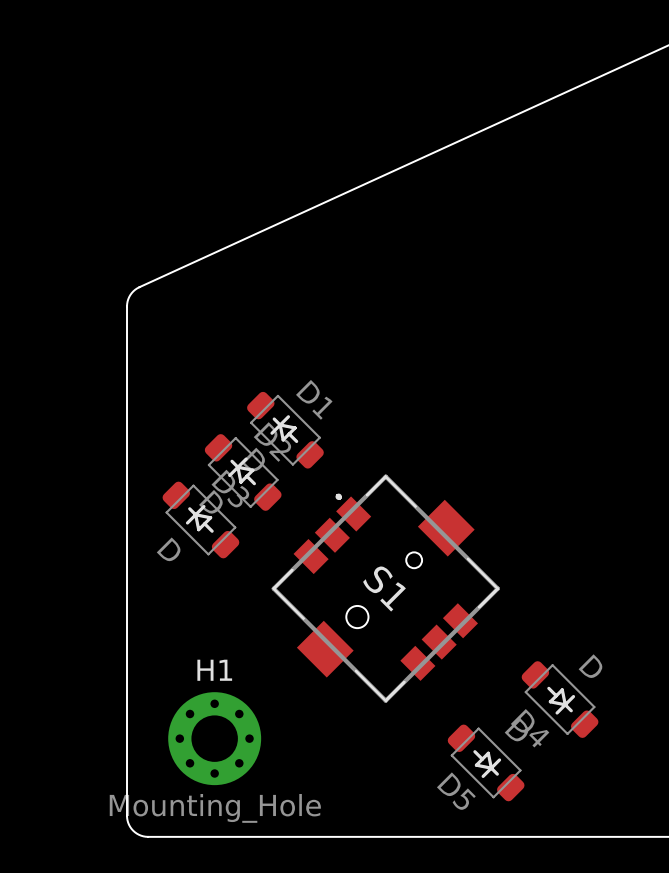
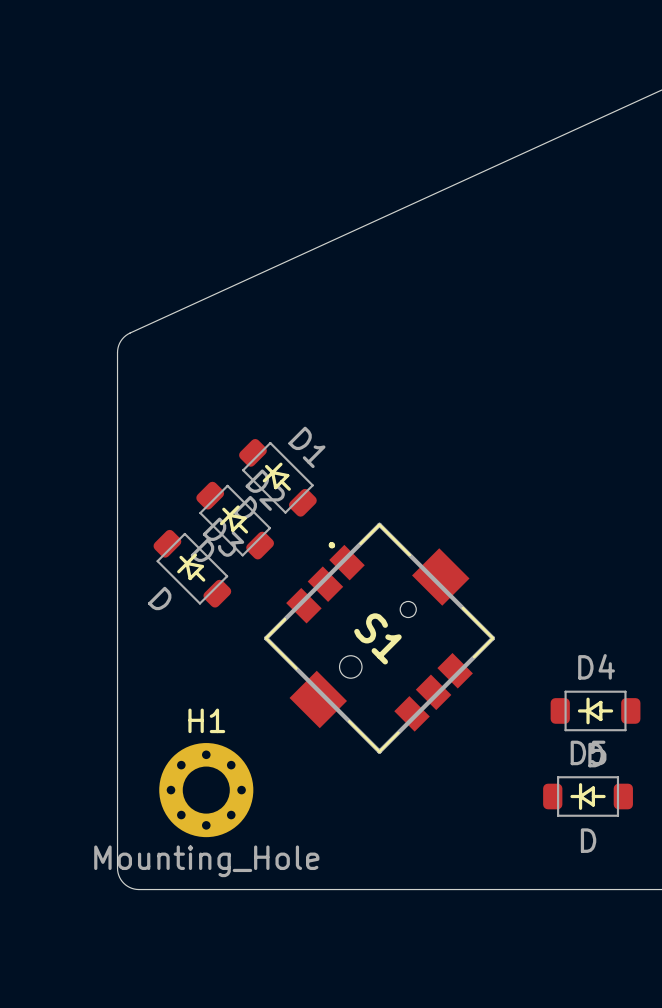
D4 rotation: 0° (560, 699) -> 135° clockwise (595, 710)
D4 position: (560, 699) -> (595, 710)
D5 rotation: 0° (486, 762) -> 135° clockwise (588, 796)
D5 position: (486, 762) -> (588, 796)

